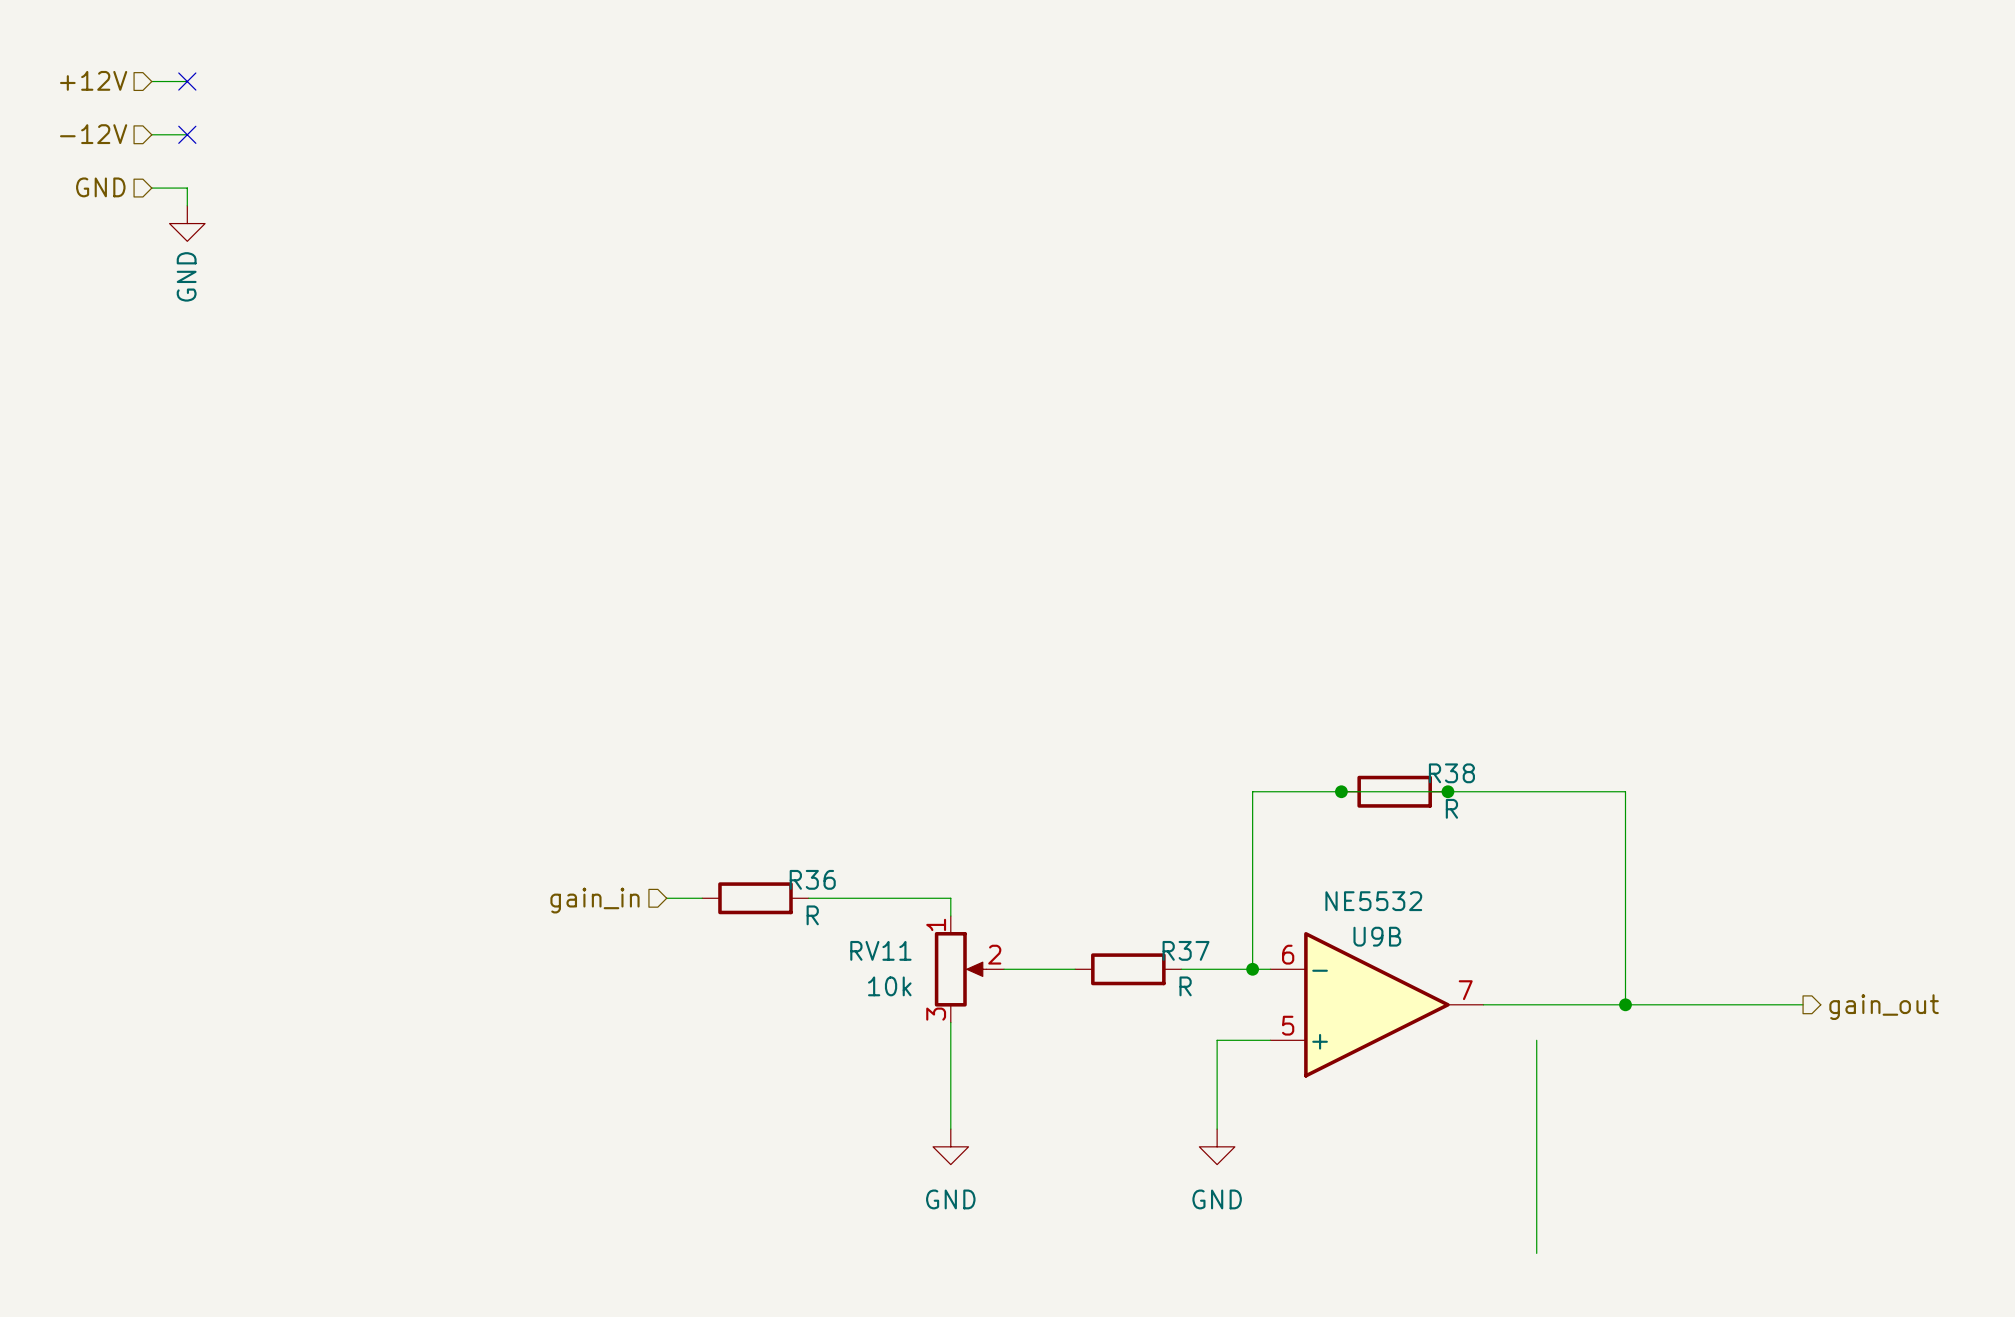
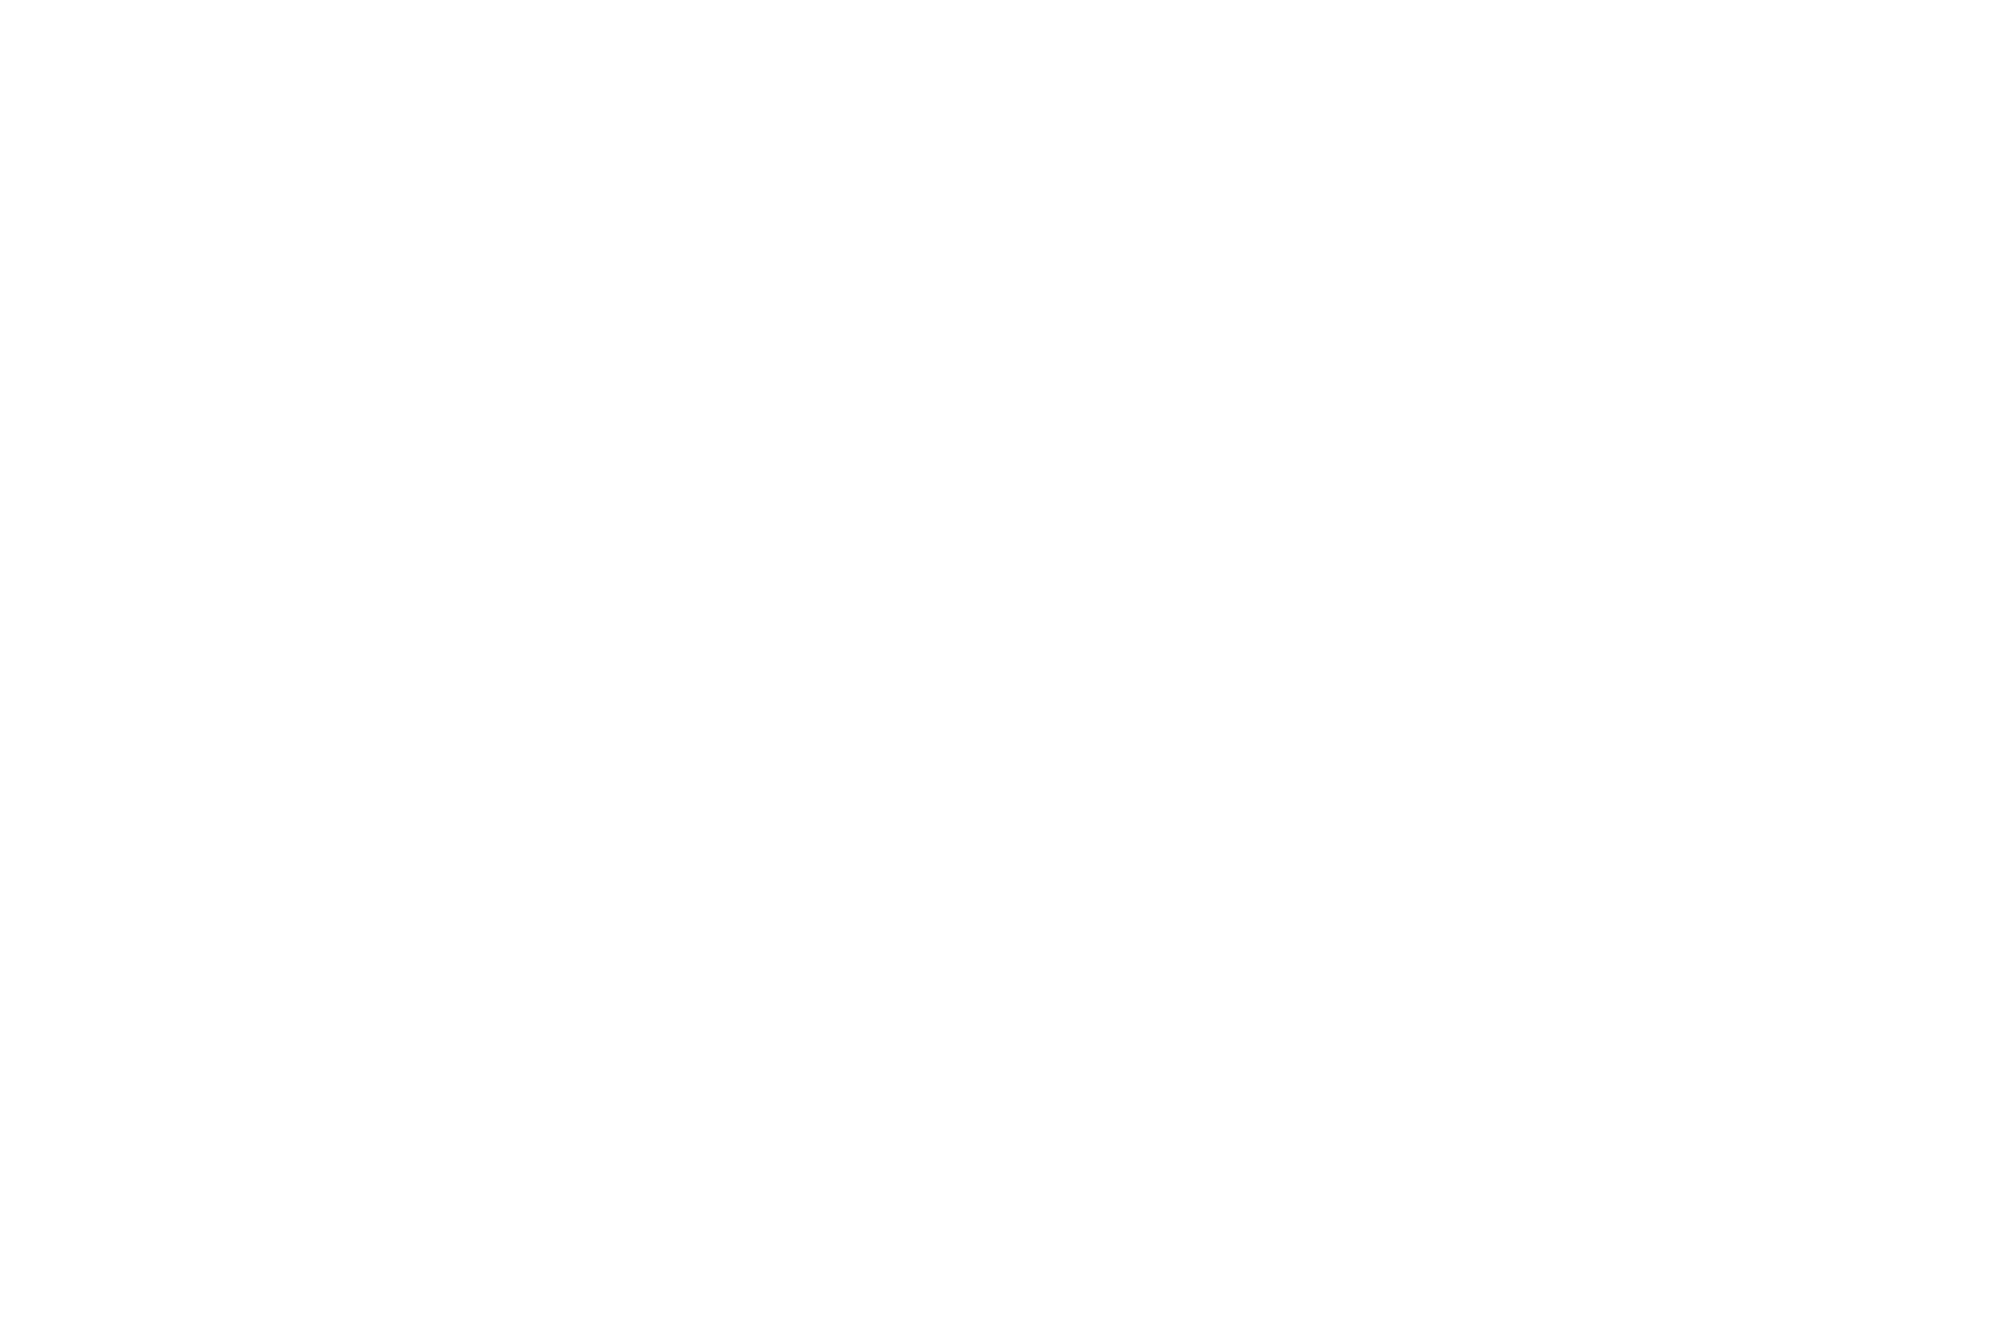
hierarchical label: +12V (93, 80) -> none
wire: (151, 81) (187, 81) -> none
no-connect mark: (187, 81) -> none
hierarchical label: -12V (93, 134) -> none
wire: (151, 134) (187, 134) -> none
no-connect mark: (187, 134) -> none
hierarchical label: GND (100, 187) -> none
wire: (151, 188) (187, 188) (187, 205) -> none
power symbol: GND (187, 223) -> none
junction: (1341, 791) -> none
R38: R (1394, 791) -> none
junction: (1447, 791) -> none
wire: (666, 898) (702, 898) -> none
R36: R (755, 898) -> none
wire: (808, 898) (950, 898) (950, 916) -> none
hierarchical label: gain_in (594, 900) -> none
RV11: 10k (969, 969) -> none
wire: (1004, 969) (1075, 969) -> none
R37: R (1128, 969) -> none
wire: (1181, 969) (1270, 969) -> none
wire: (1252, 969) (1252, 791) (1625, 791) (1625, 1004) -> none
junction: (1252, 969) -> none
U9B: NE5532 (1376, 1004) -> none
wire: (1483, 1004) (1803, 1004) -> none
junction: (1625, 1004) -> none
hierarchical label: gain_out (1884, 1007) -> none
wire: (950, 1022) (950, 1129) -> none
wire: (1270, 1040) (1217, 1040) (1217, 1129) -> none
wire: (1536, 1040) (1536, 1253) -> none
power symbol: GND (950, 1146) -> none
power symbol: GND (1217, 1146) -> none

